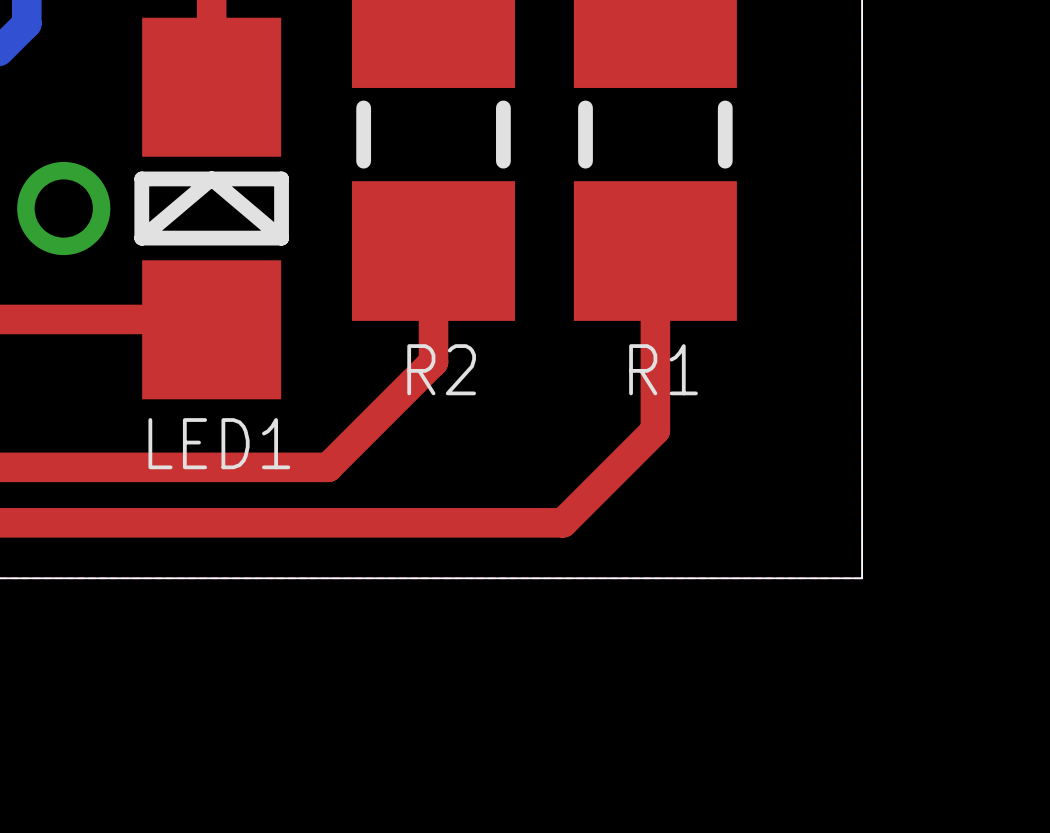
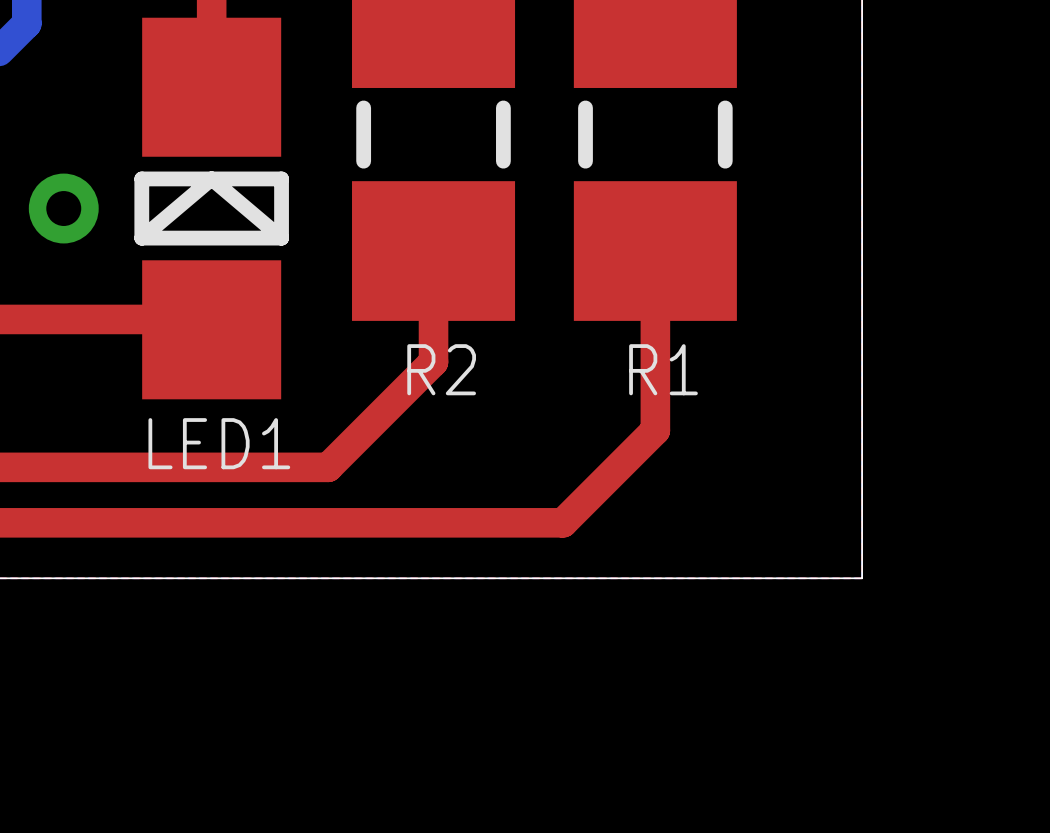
via size: [17, 161, 111, 256] -> [28, 173, 99, 244]

